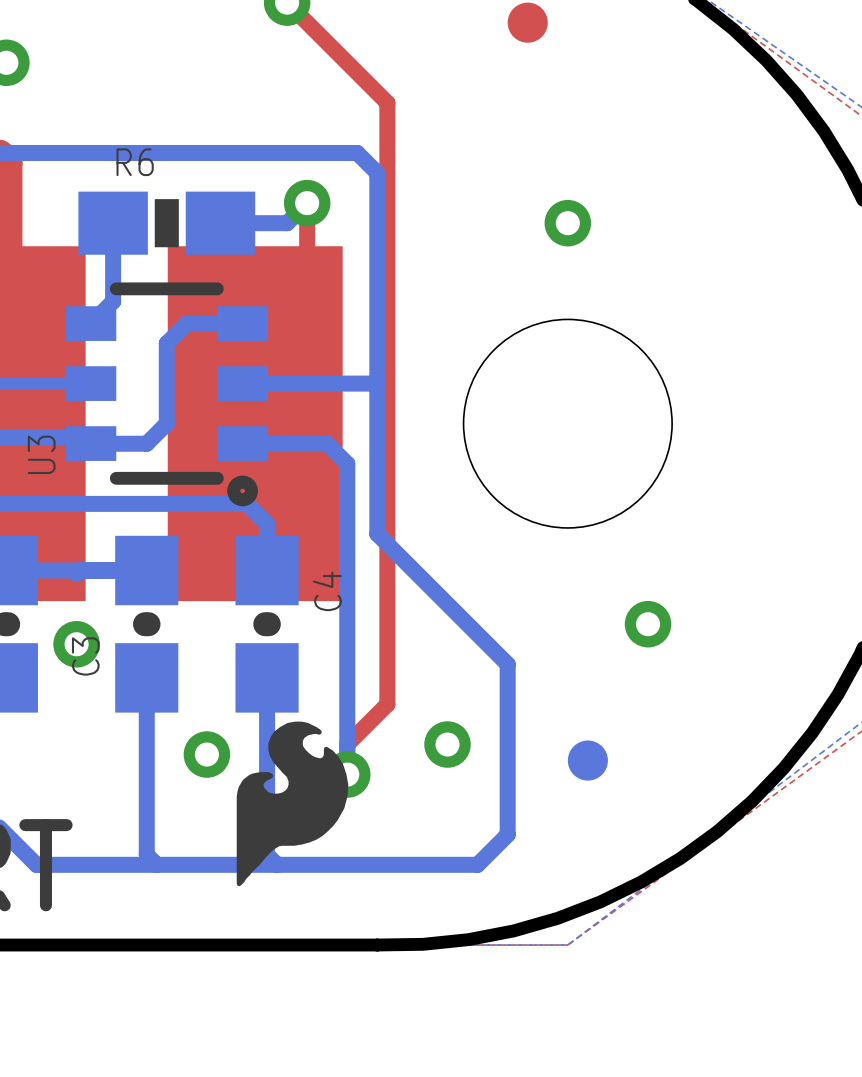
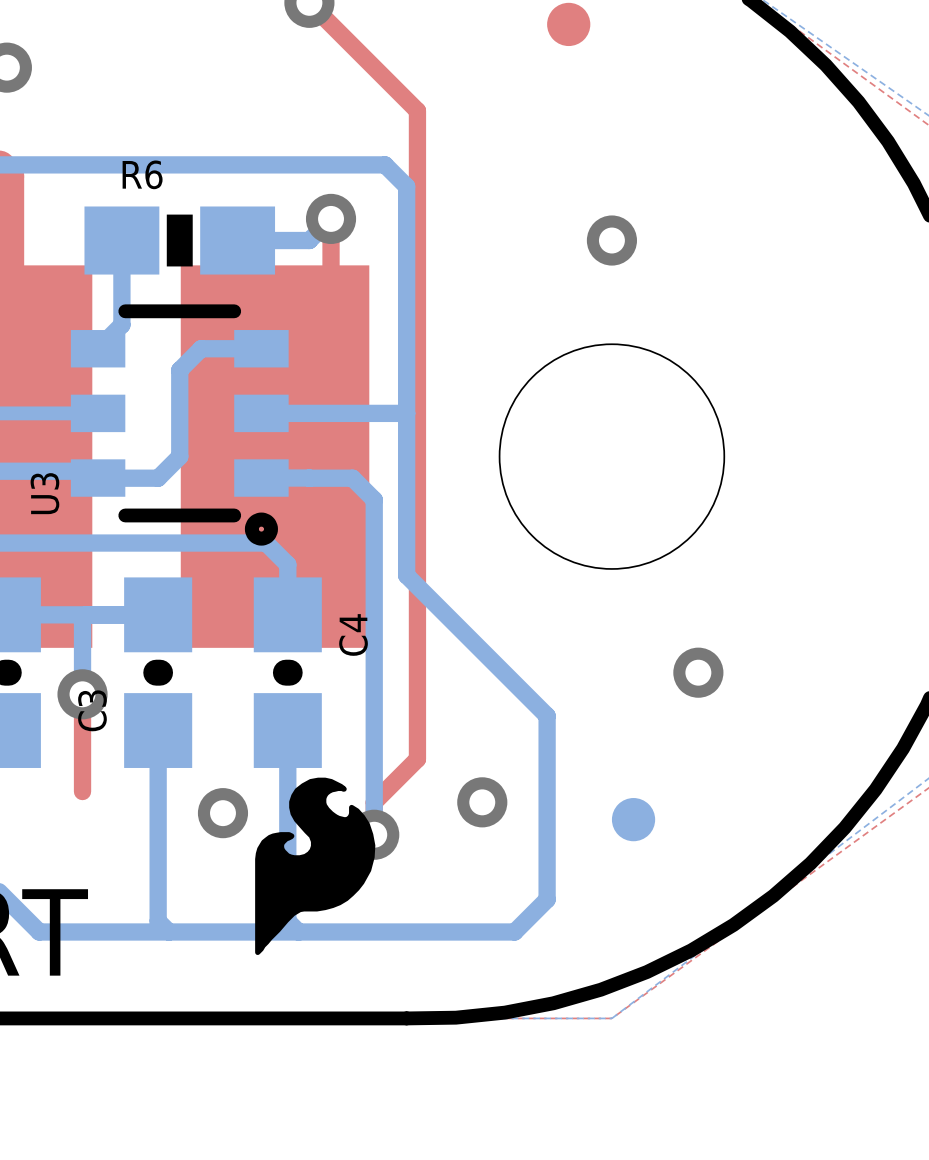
bottom track: none -> (82, 618) (82, 694)
top track: none -> (82, 694) (82, 791)

